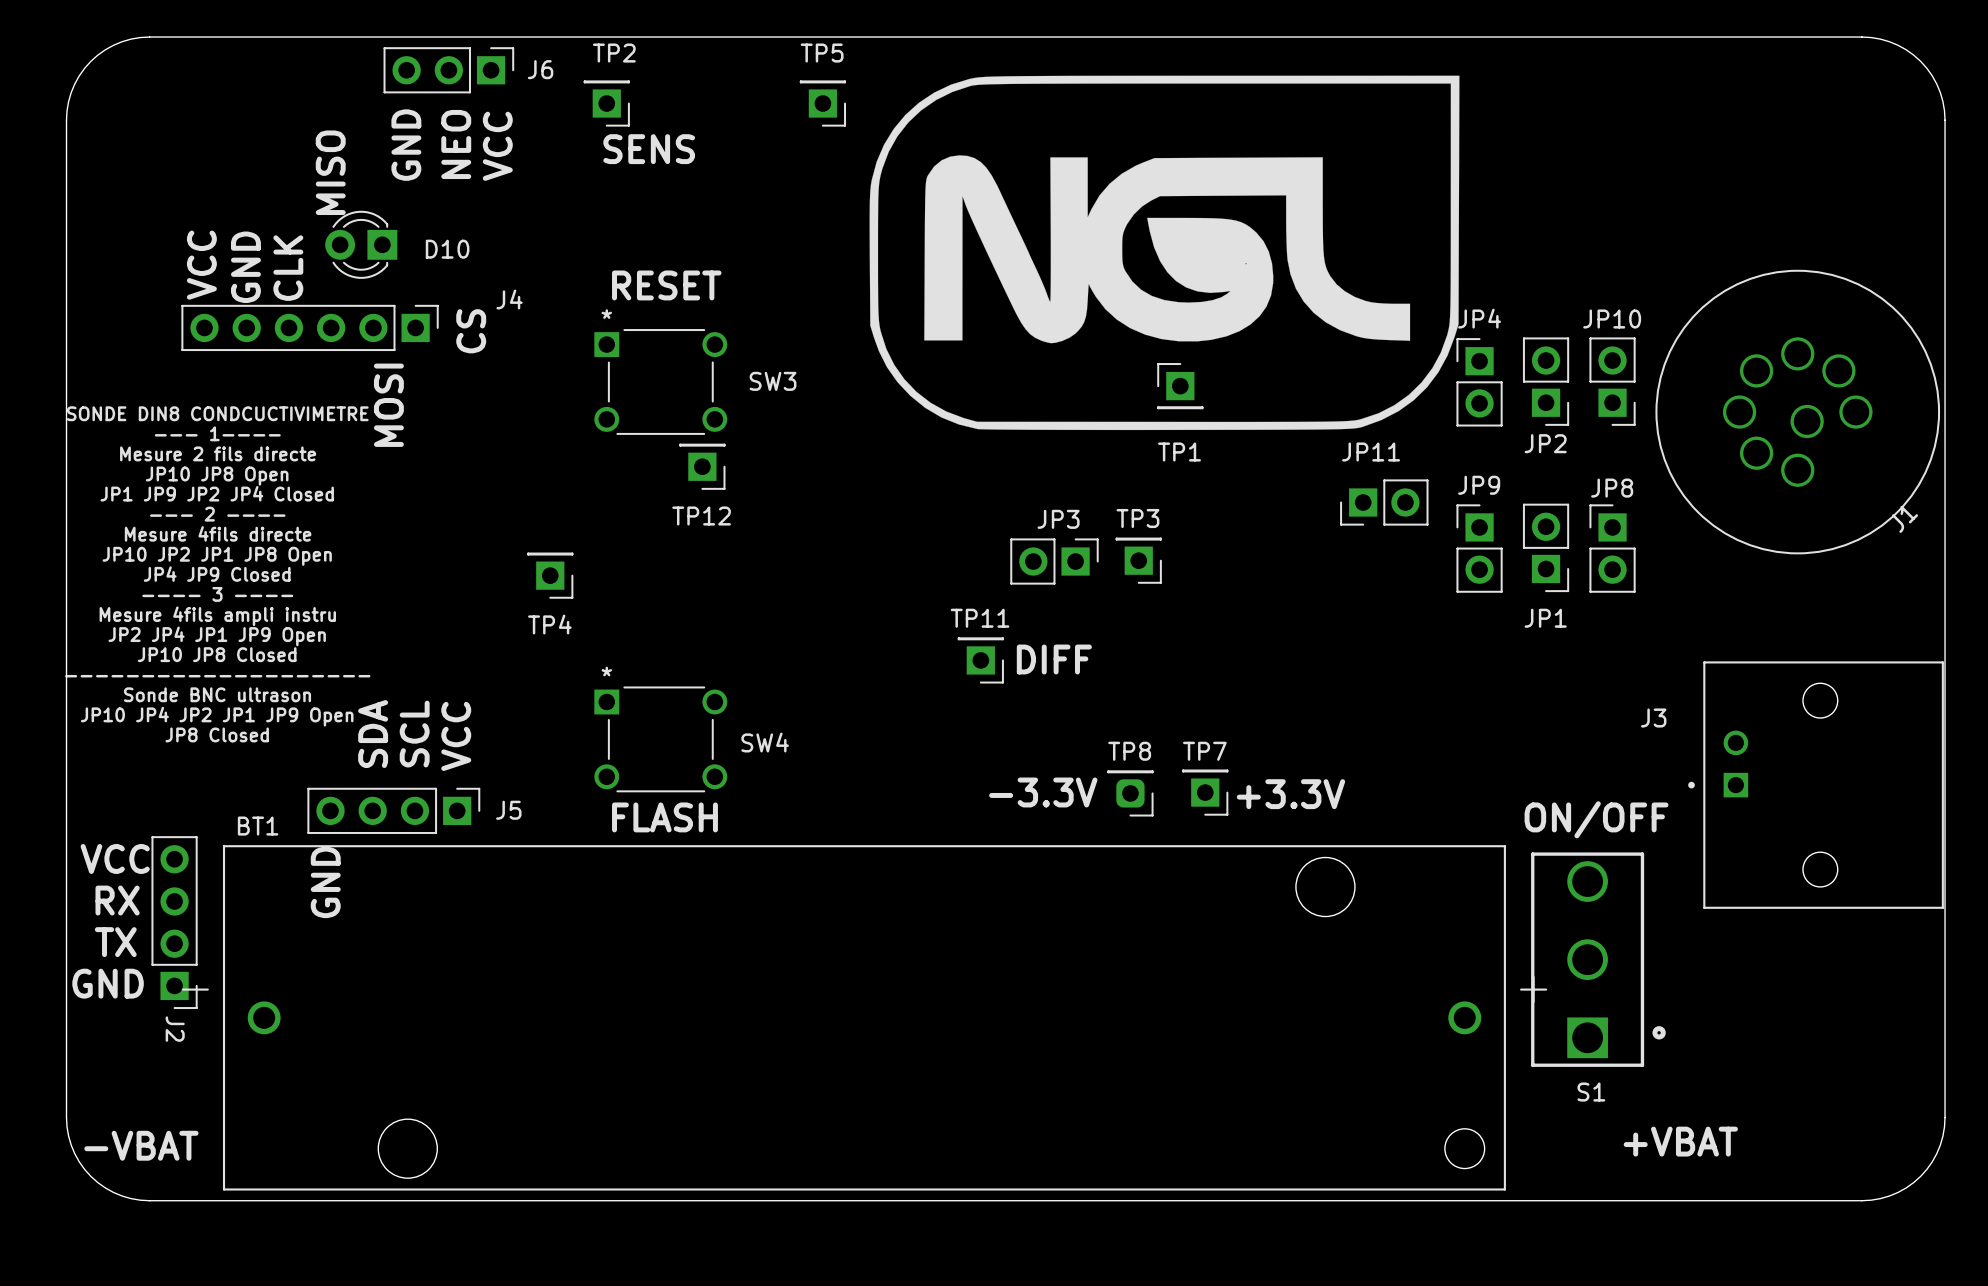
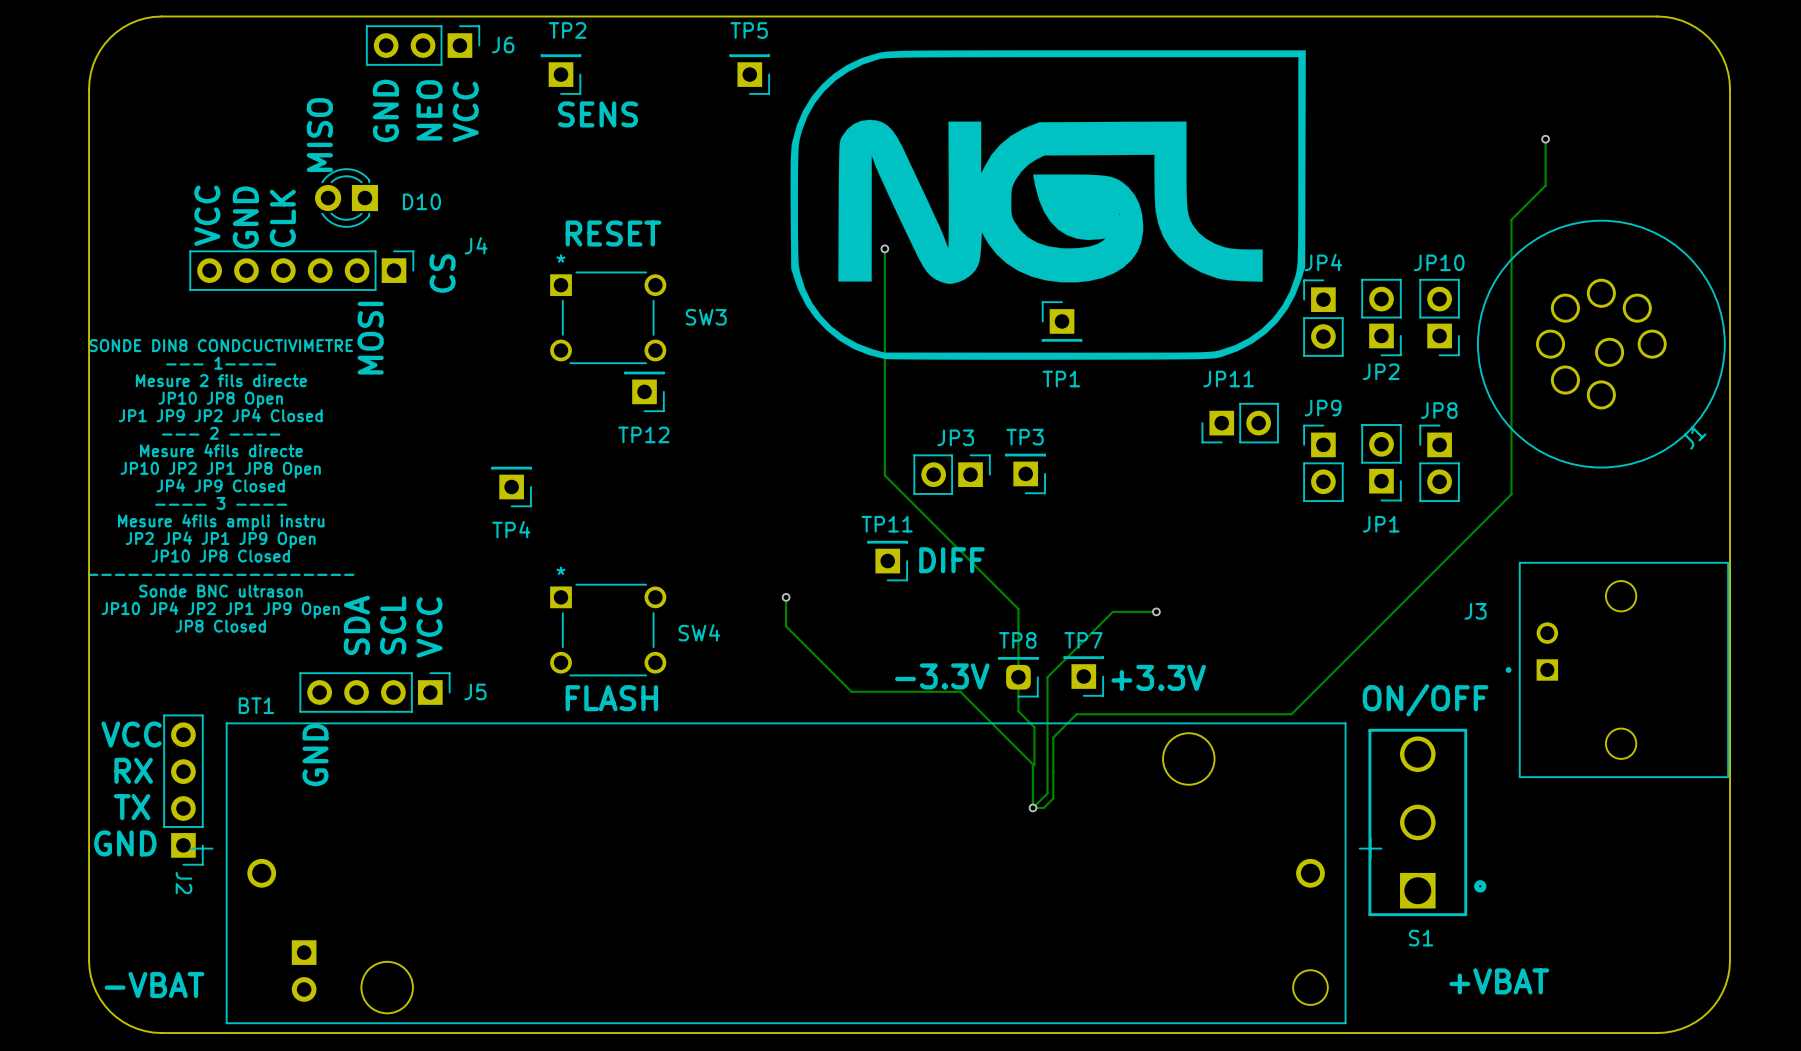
track: none -> (1545, 139) (1545, 185) (1511, 219) (1511, 494) (1291, 714) (1076, 714) (1053, 737) (1053, 798) (1043, 807) (1032, 807)
via: none -> (1545, 139)
track: none -> (884, 248) (884, 475) (1018, 608) (1018, 711) (1034, 727) (1032, 765)
via: none -> (884, 248)
track: none -> (786, 597) (786, 626) (851, 691) (960, 691) (1032, 764) (1032, 807)
via: none -> (786, 597)
track: none -> (1156, 611) (1112, 611) (1047, 677) (1047, 793) (1032, 807)
via: none -> (1156, 611)
via: none -> (1032, 807)
part: none -> (304, 971)

